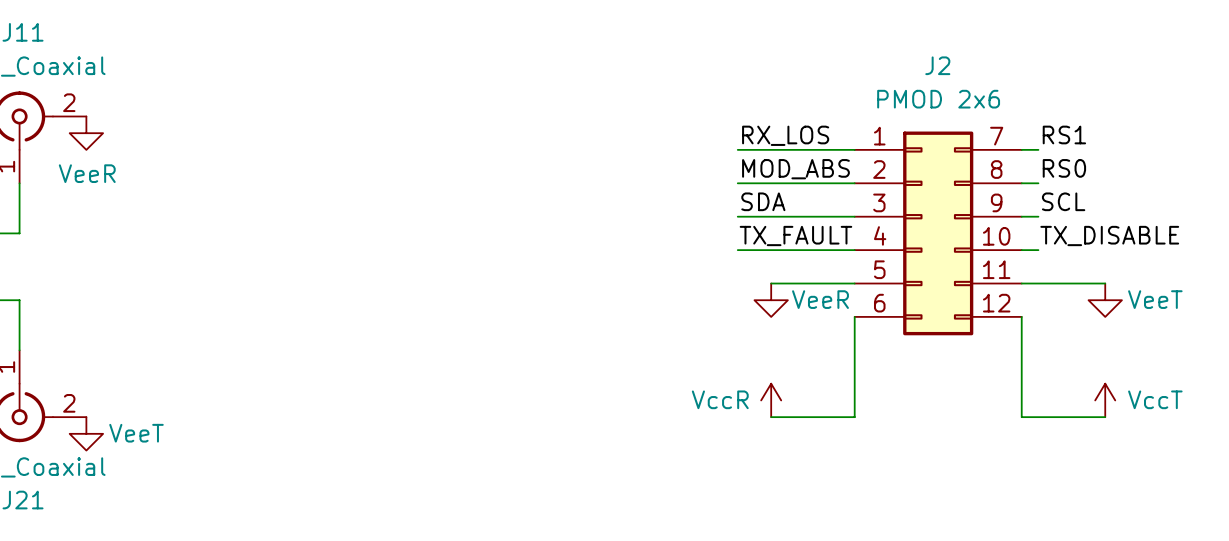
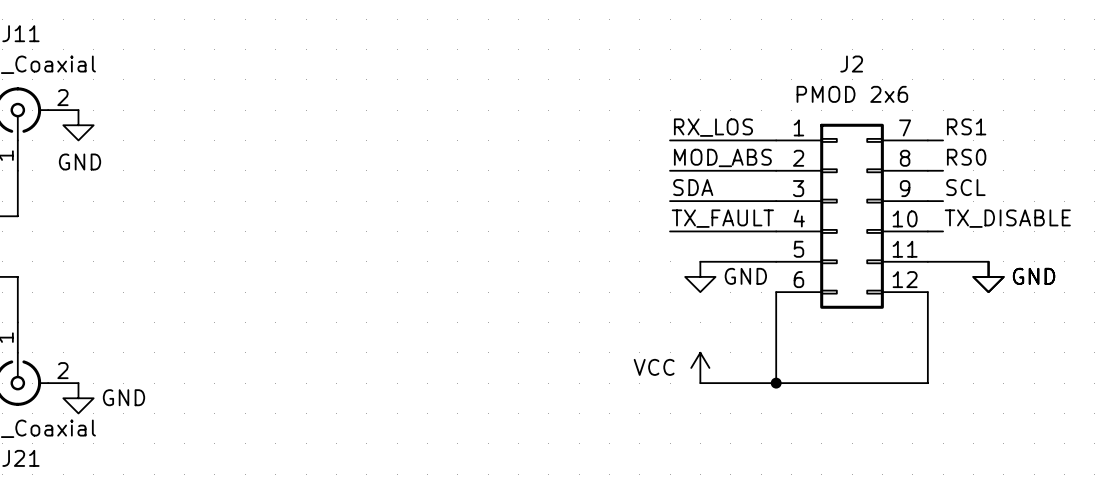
power symbol: VeeR (86, 133) -> GND (78, 125)
wire: (1088, 283) (1105, 283) -> none
power symbol: VeeR (771, 300) -> GND (700, 276)
power symbol: none -> GND (988, 276)
power symbol: VeeT (1105, 300) -> none
power symbol: VccR (771, 400) -> VCC (700, 367)
power symbol: VccT (1105, 400) -> none
junction: none -> (776, 383)
wire: (1021, 417) (1105, 417) -> (927, 383) (776, 383)
power symbol: VeeT (86, 433) -> GND (78, 398)

